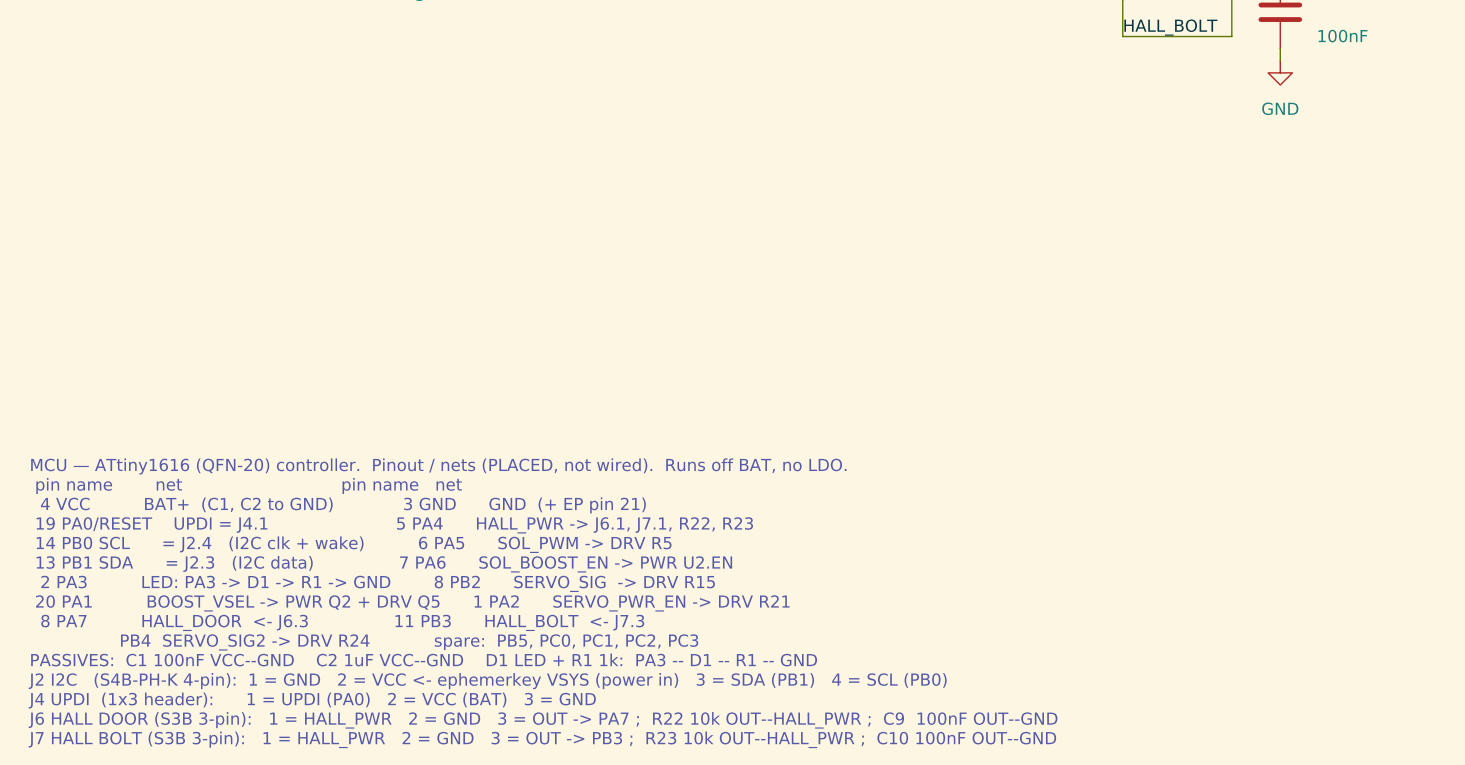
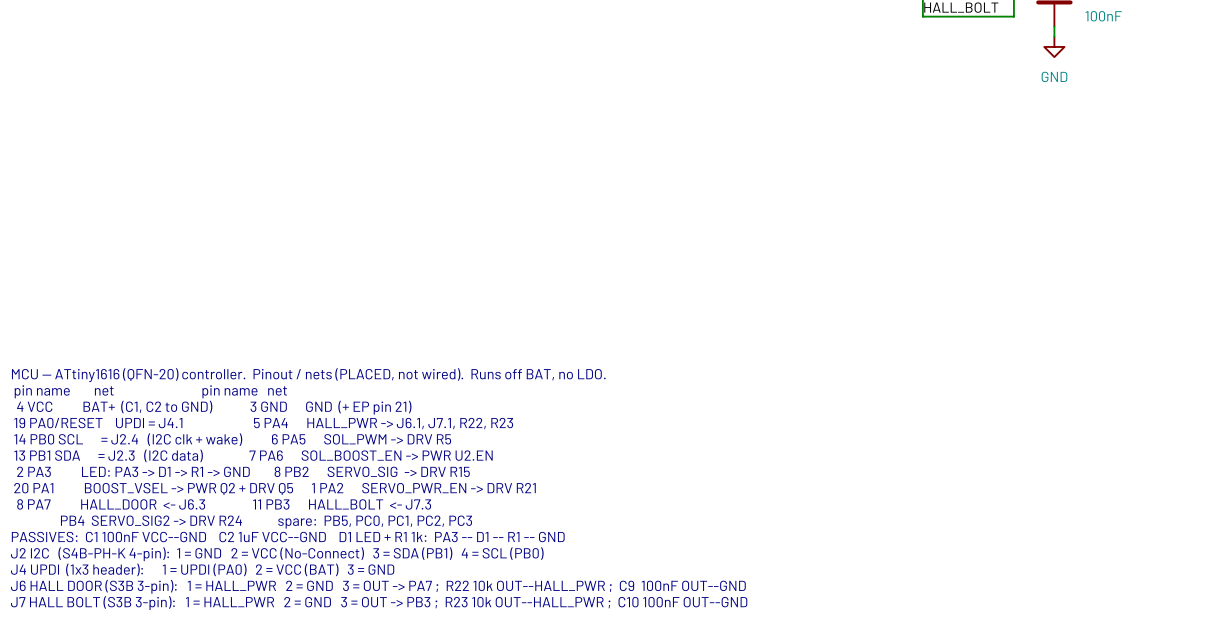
text: J2 I2C (S4B-PH-K 4-pin): 1 = GND 2 = VCC <- ephemerkey VSYS (power in) 3 = SDA (PB1) 4 = SCL (PB0) (487, 681) -> J2 I2C (S4B-PH-K 4-pin): 1 = GND 2 = VCC (No-Connect) 3 = SDA (PB1) 4 = SCL (PB0) (277, 554)

